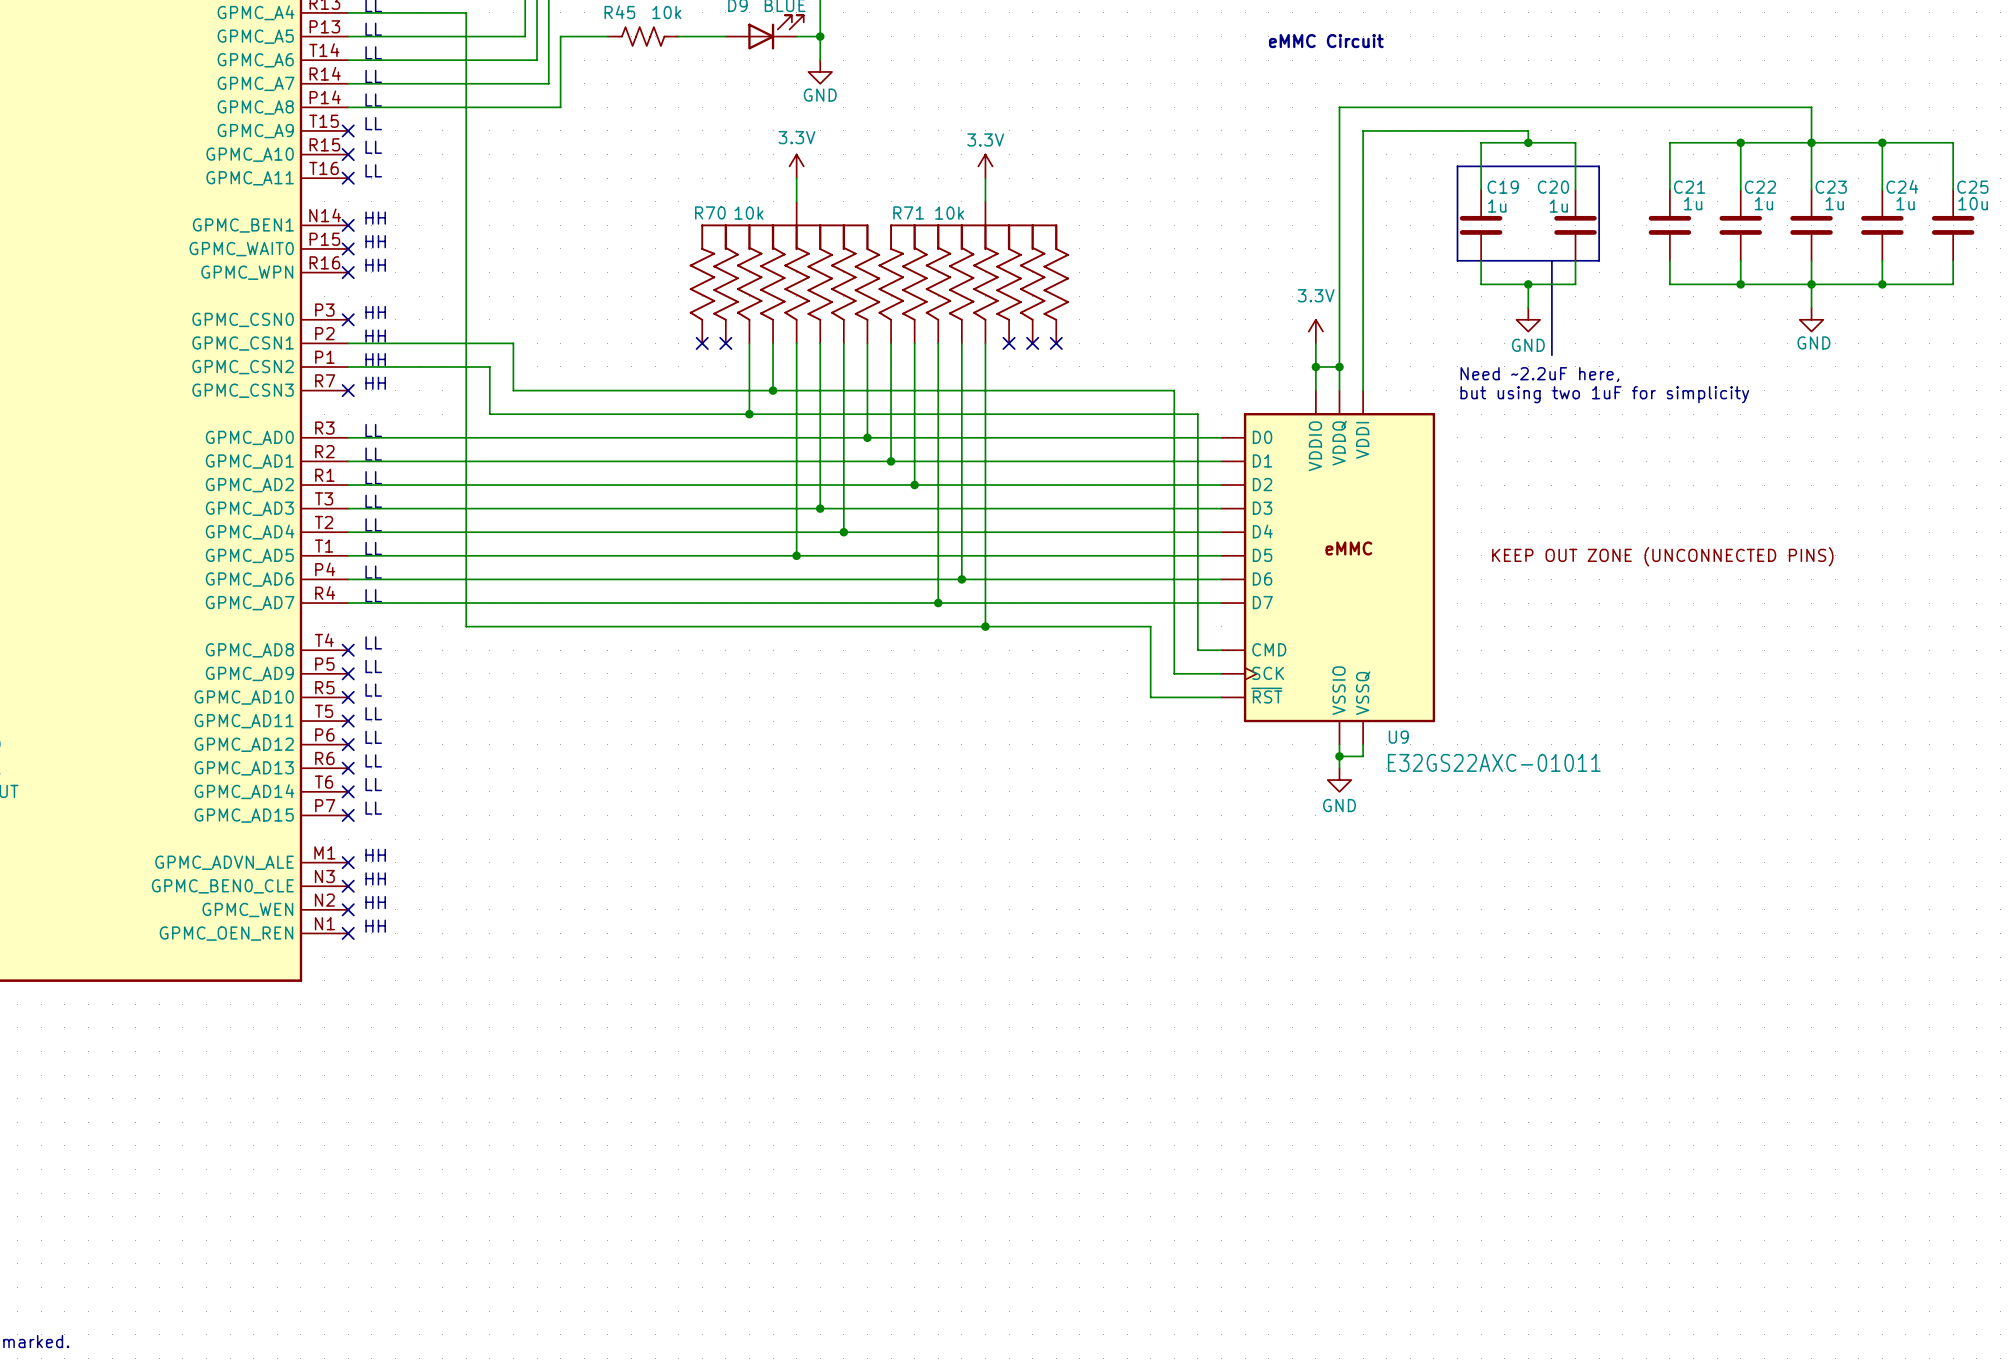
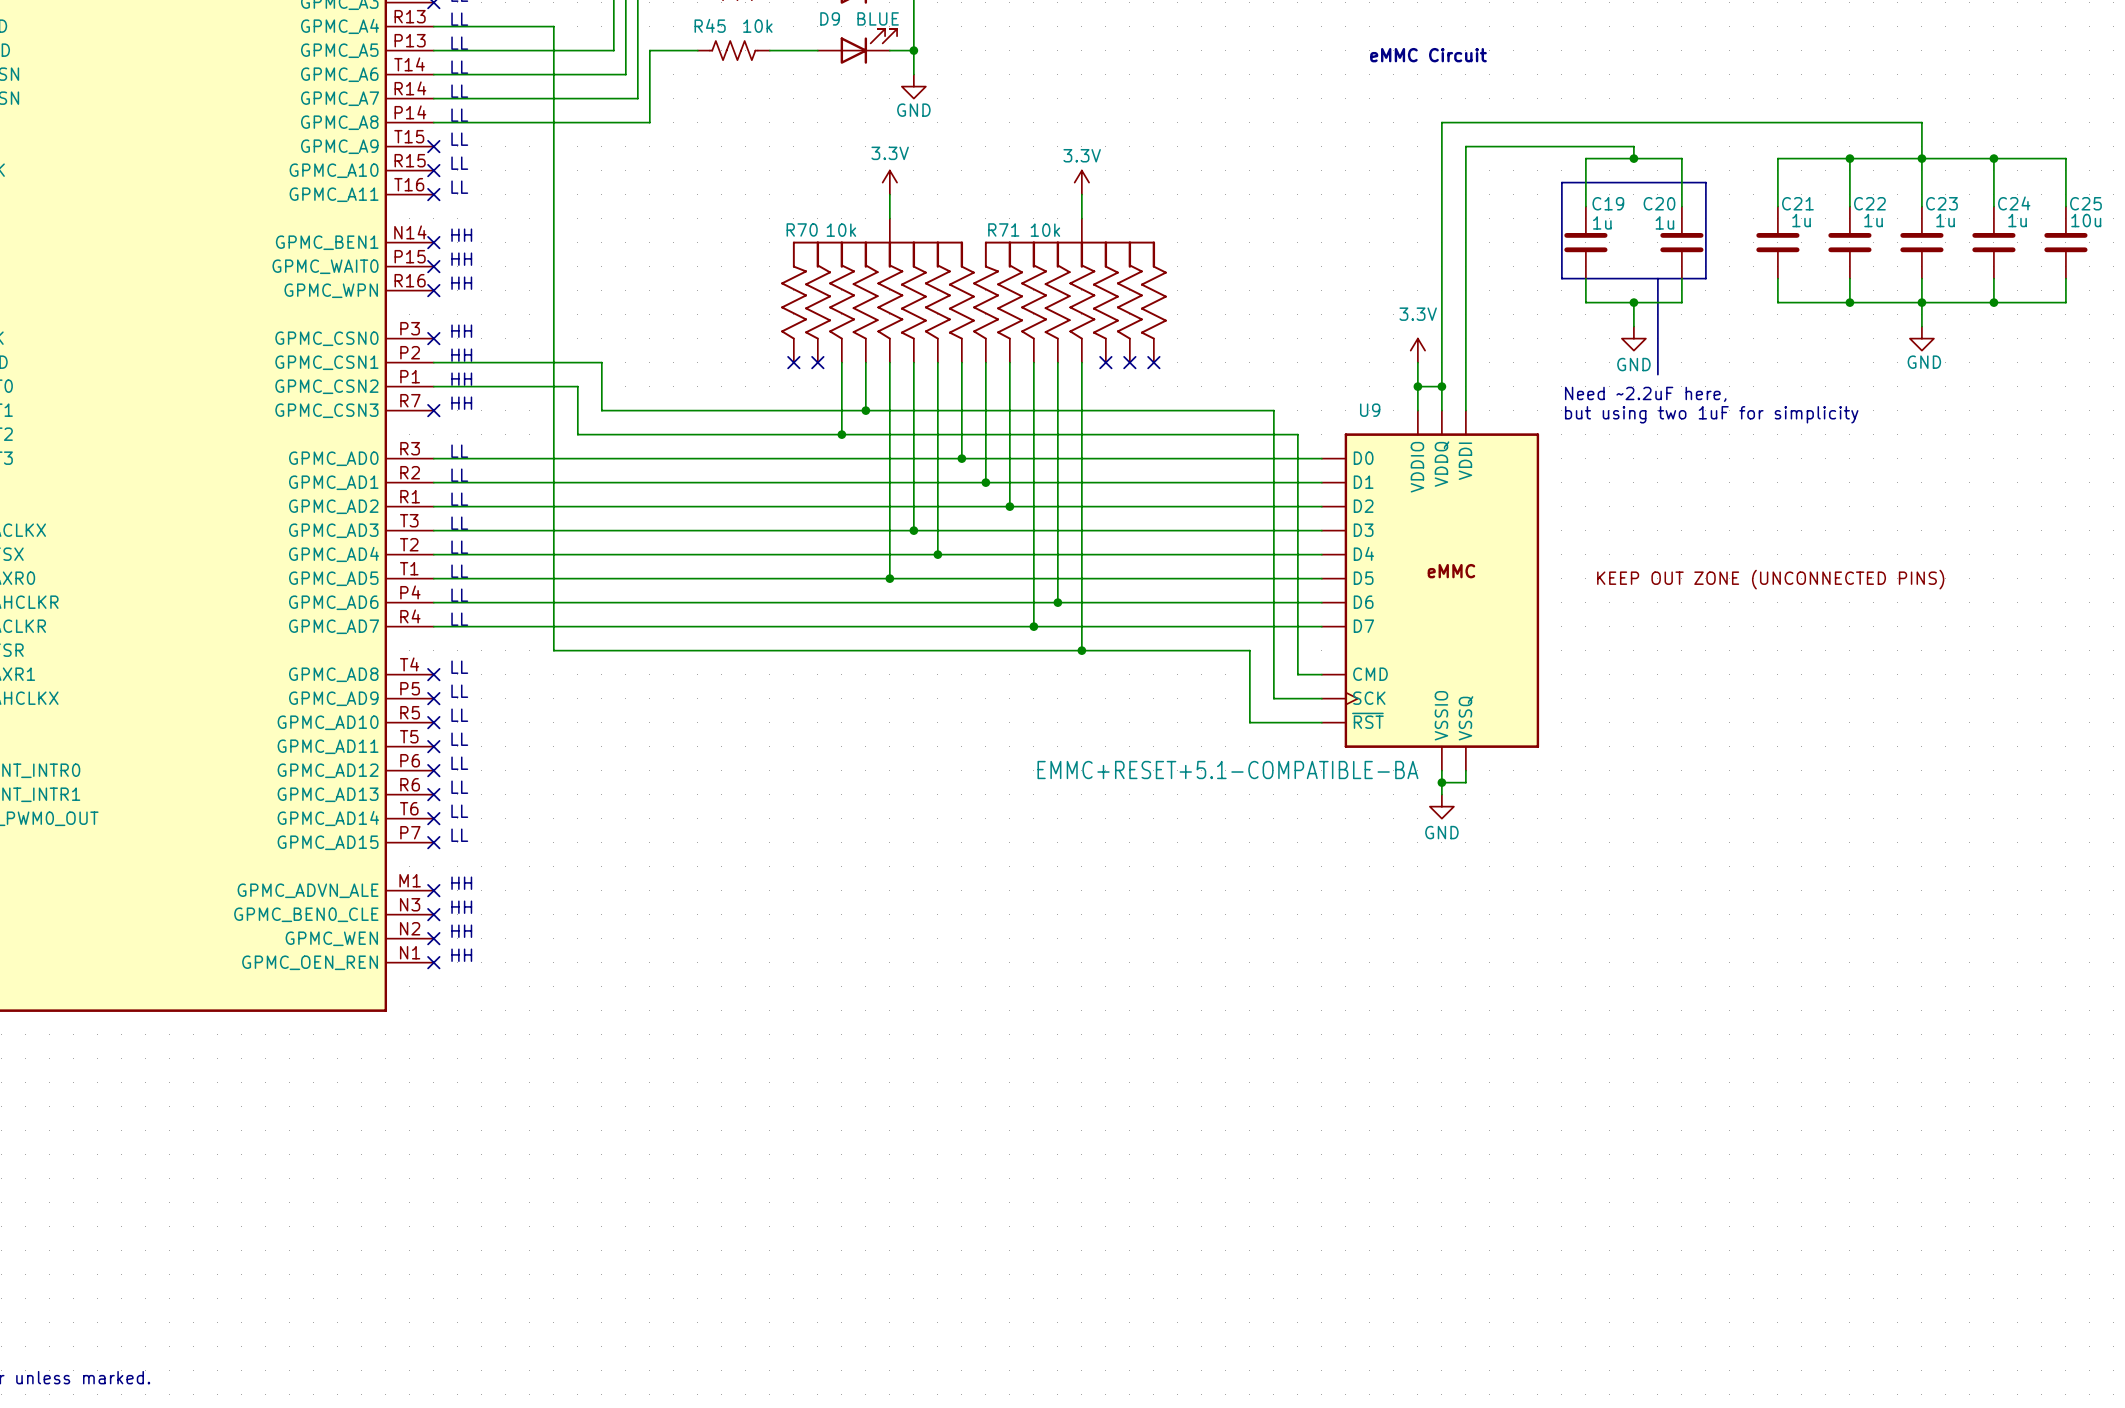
U9 name position: U9 (1398, 737) -> U9 (1370, 410)
U9 value: E32GS22AXC-01011 (1494, 762) -> EMMC+RESET+5.1-COMPATIBLE-BA (1227, 770)

